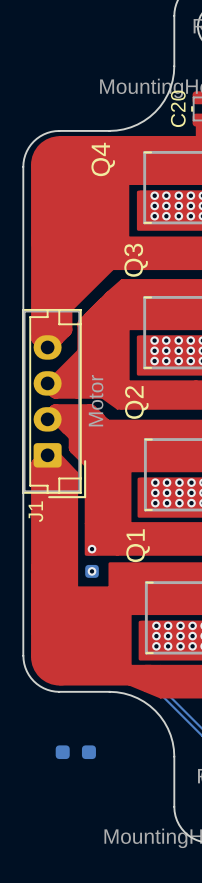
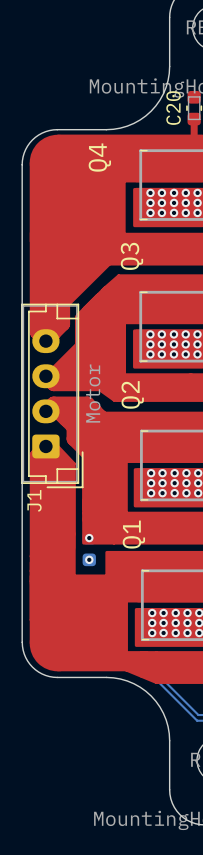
part: (75, 752) -> none

